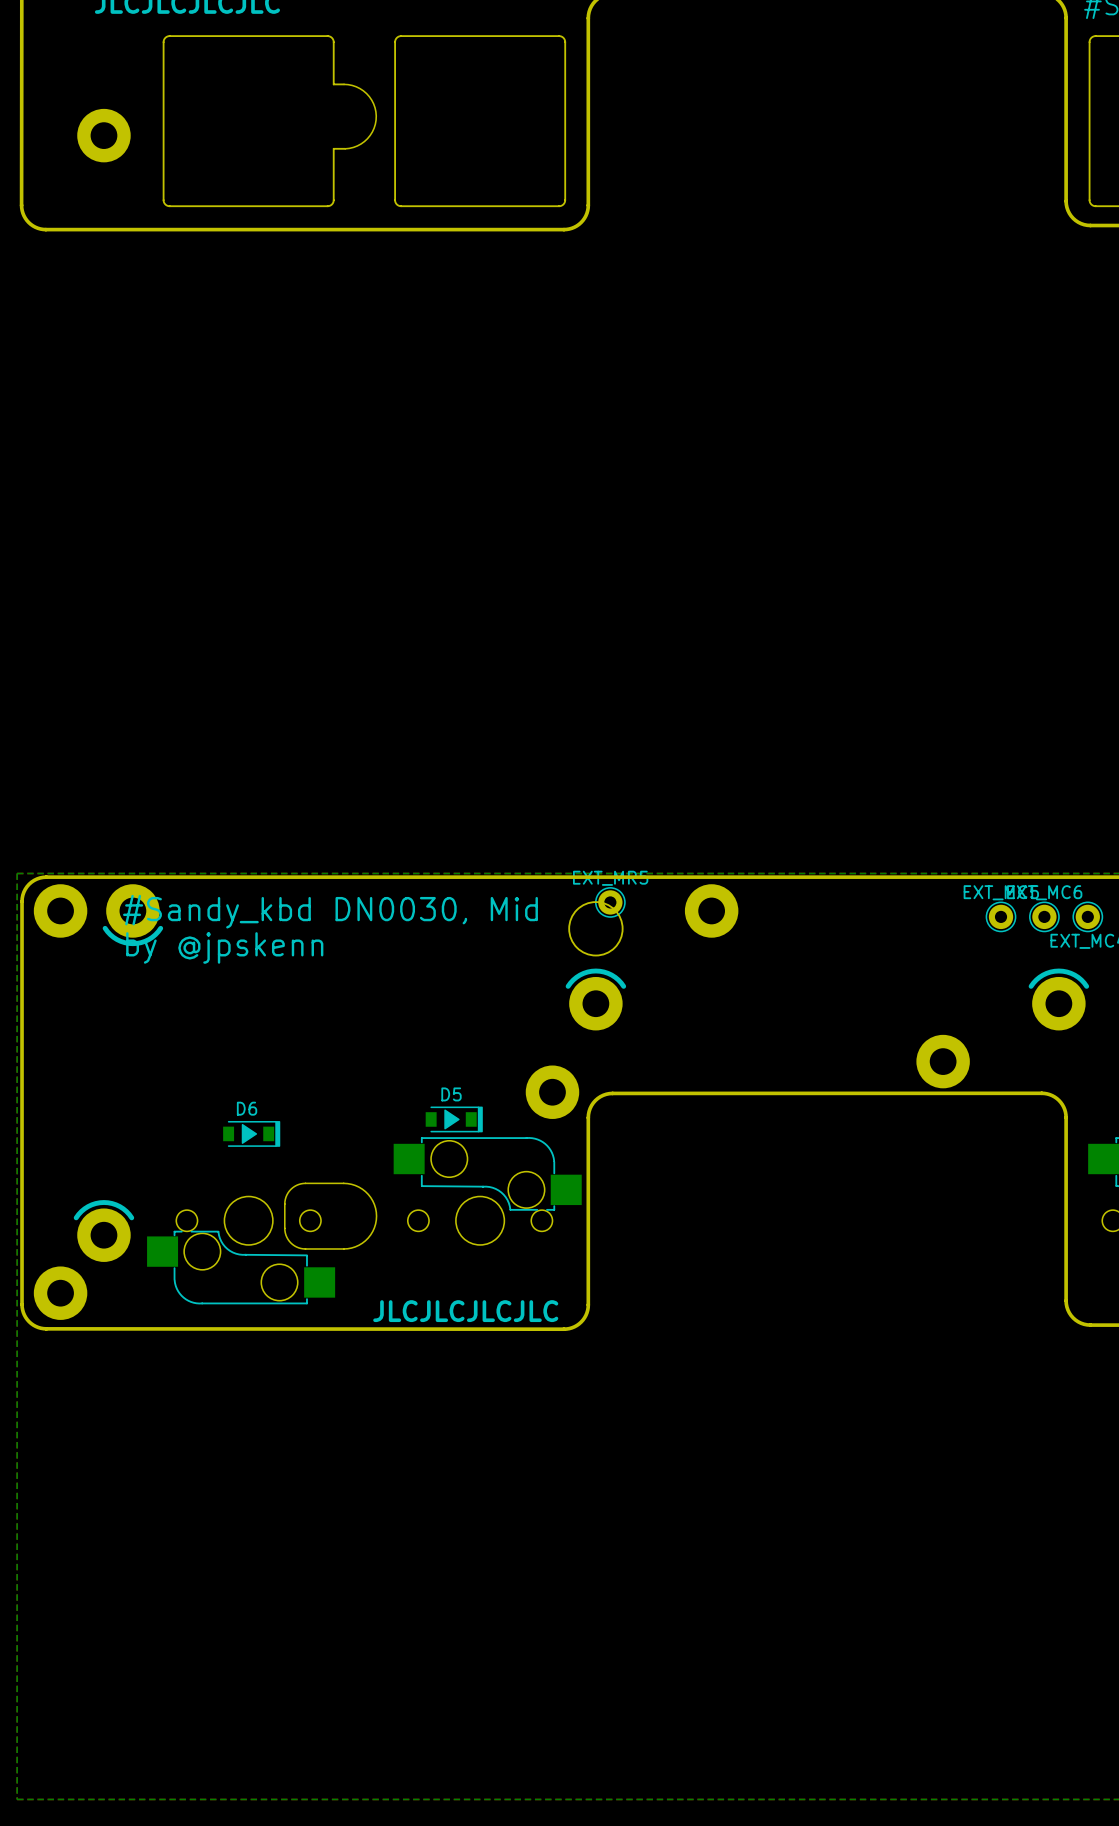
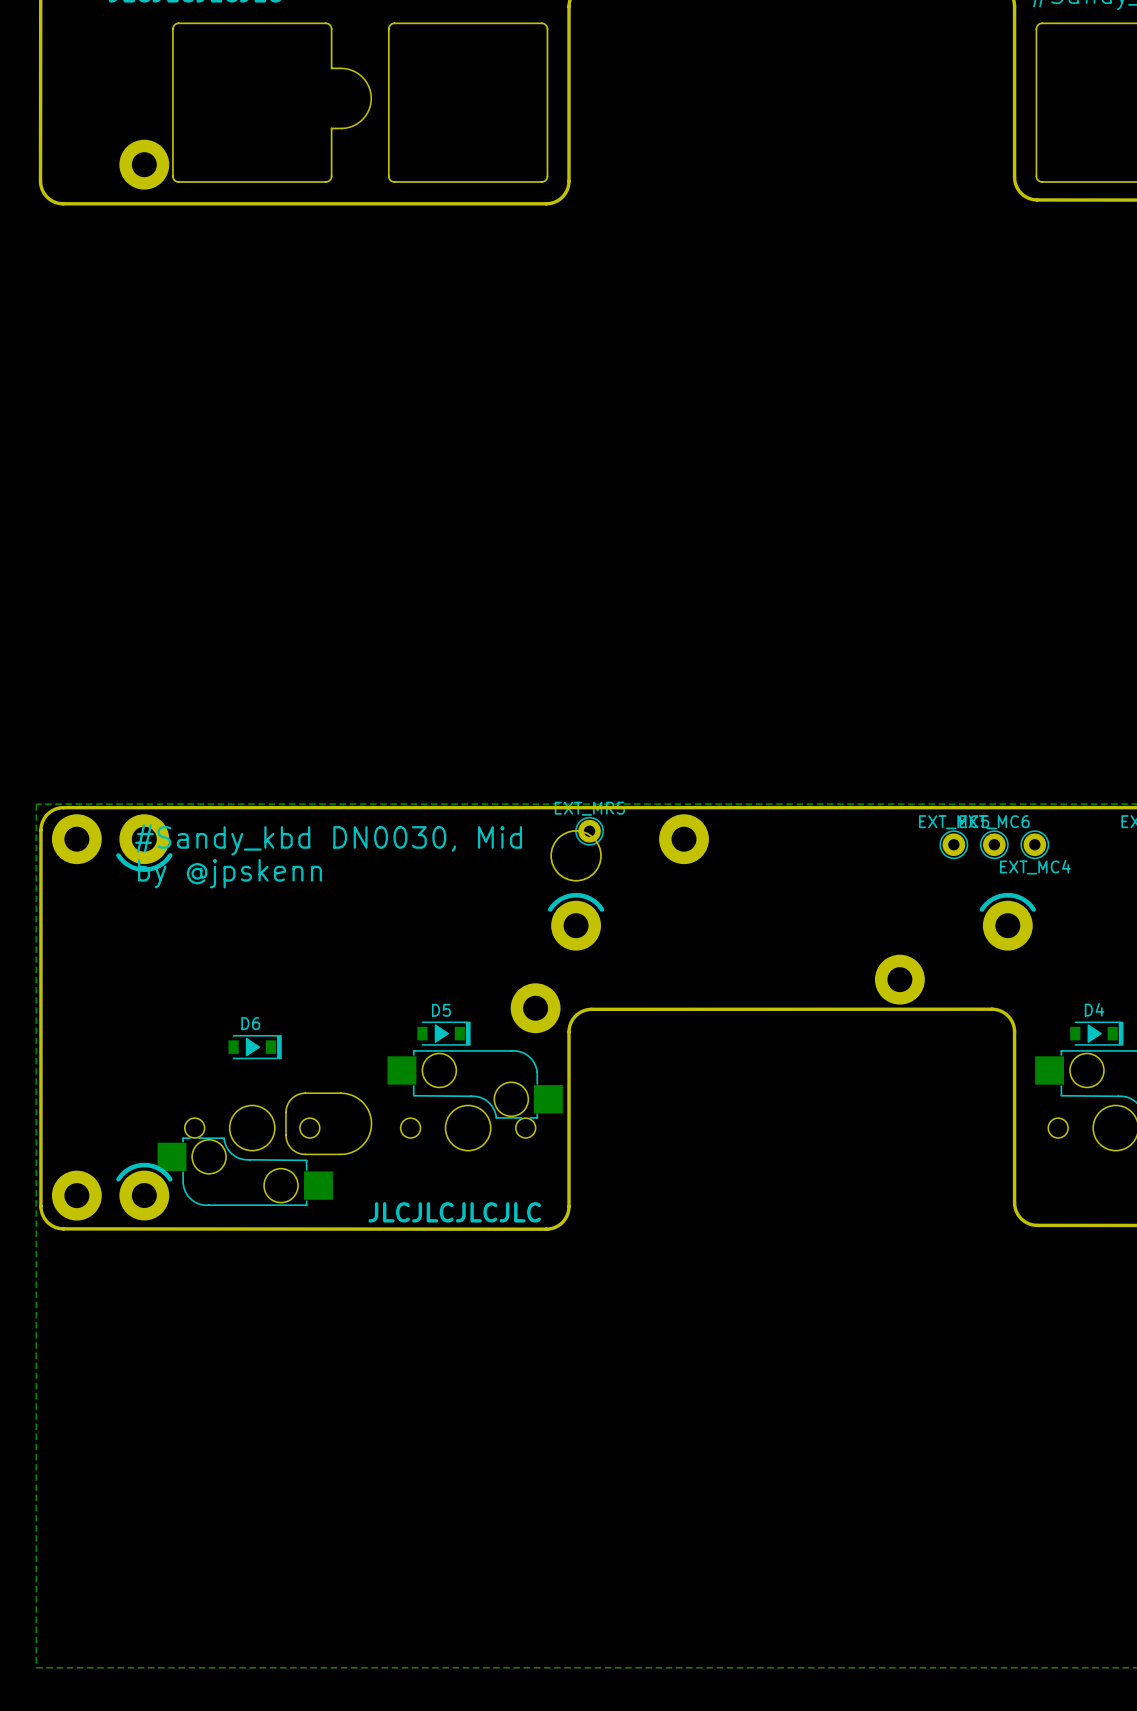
part position: (103, 135) -> (144, 164)
part position: (103, 1231) -> (144, 1191)

